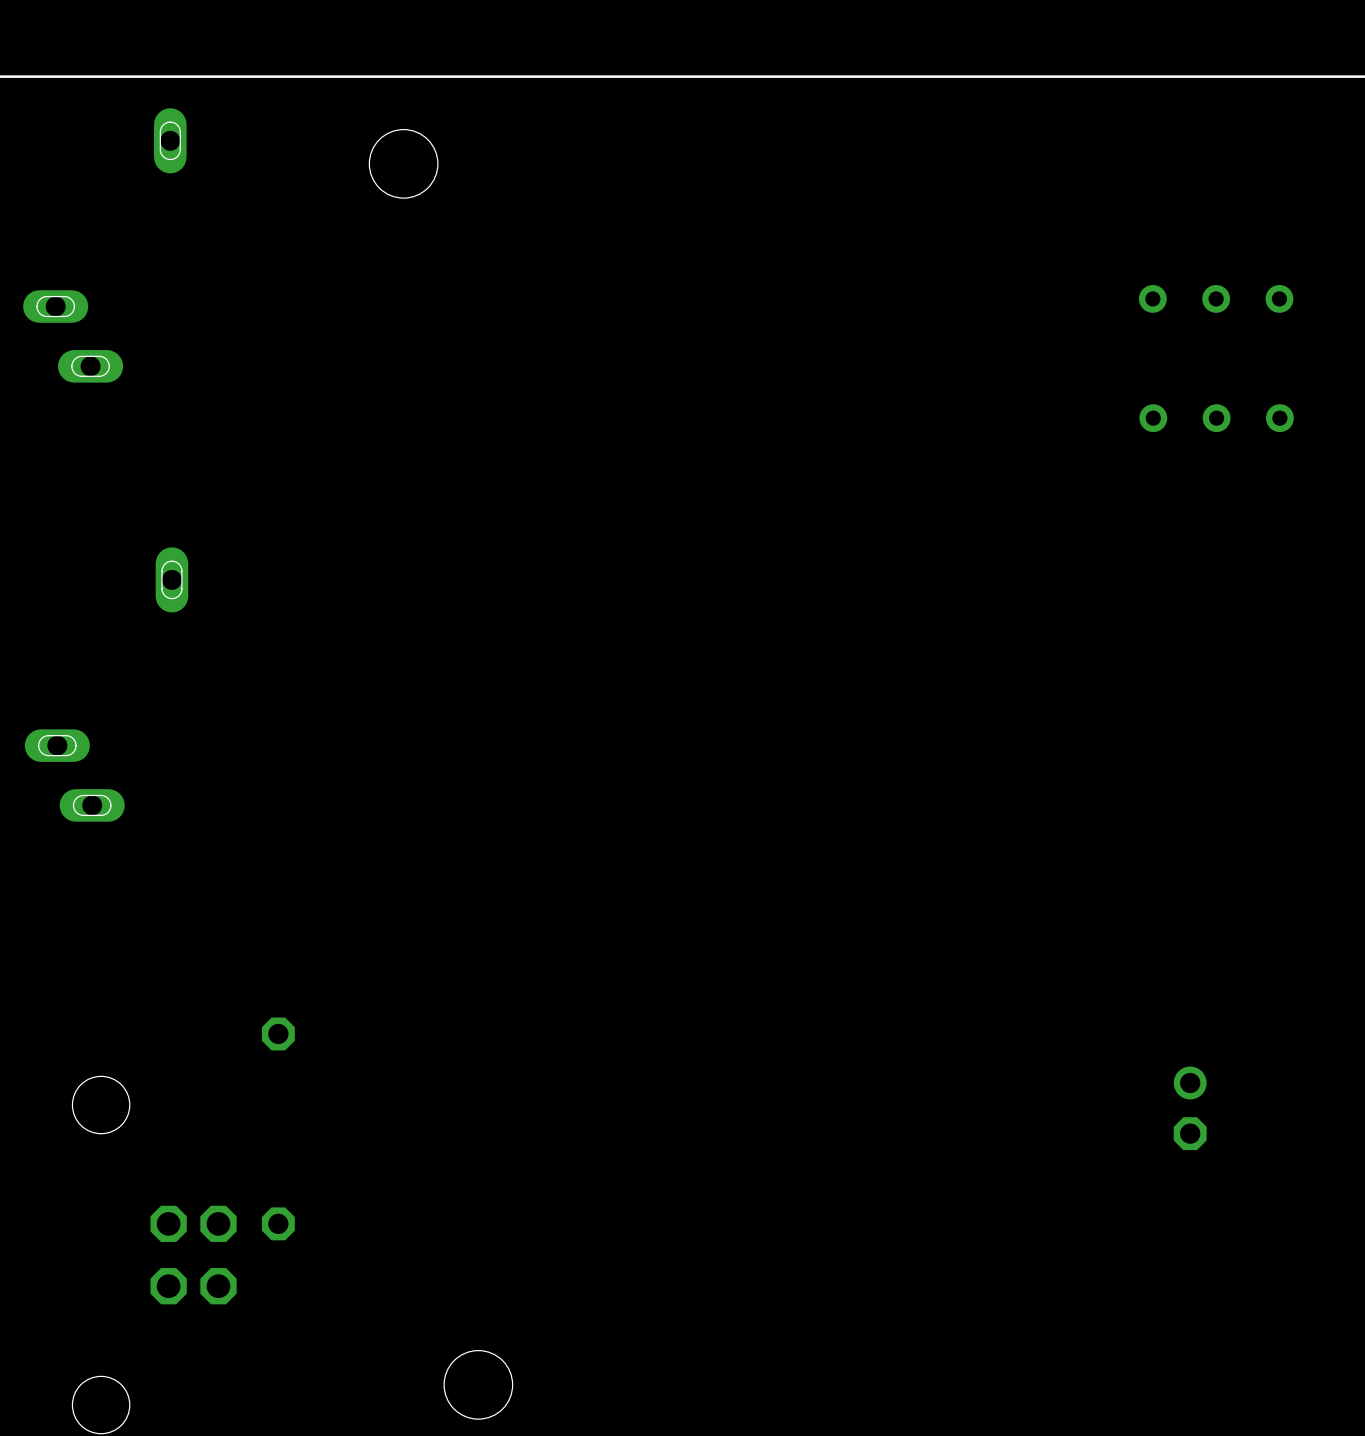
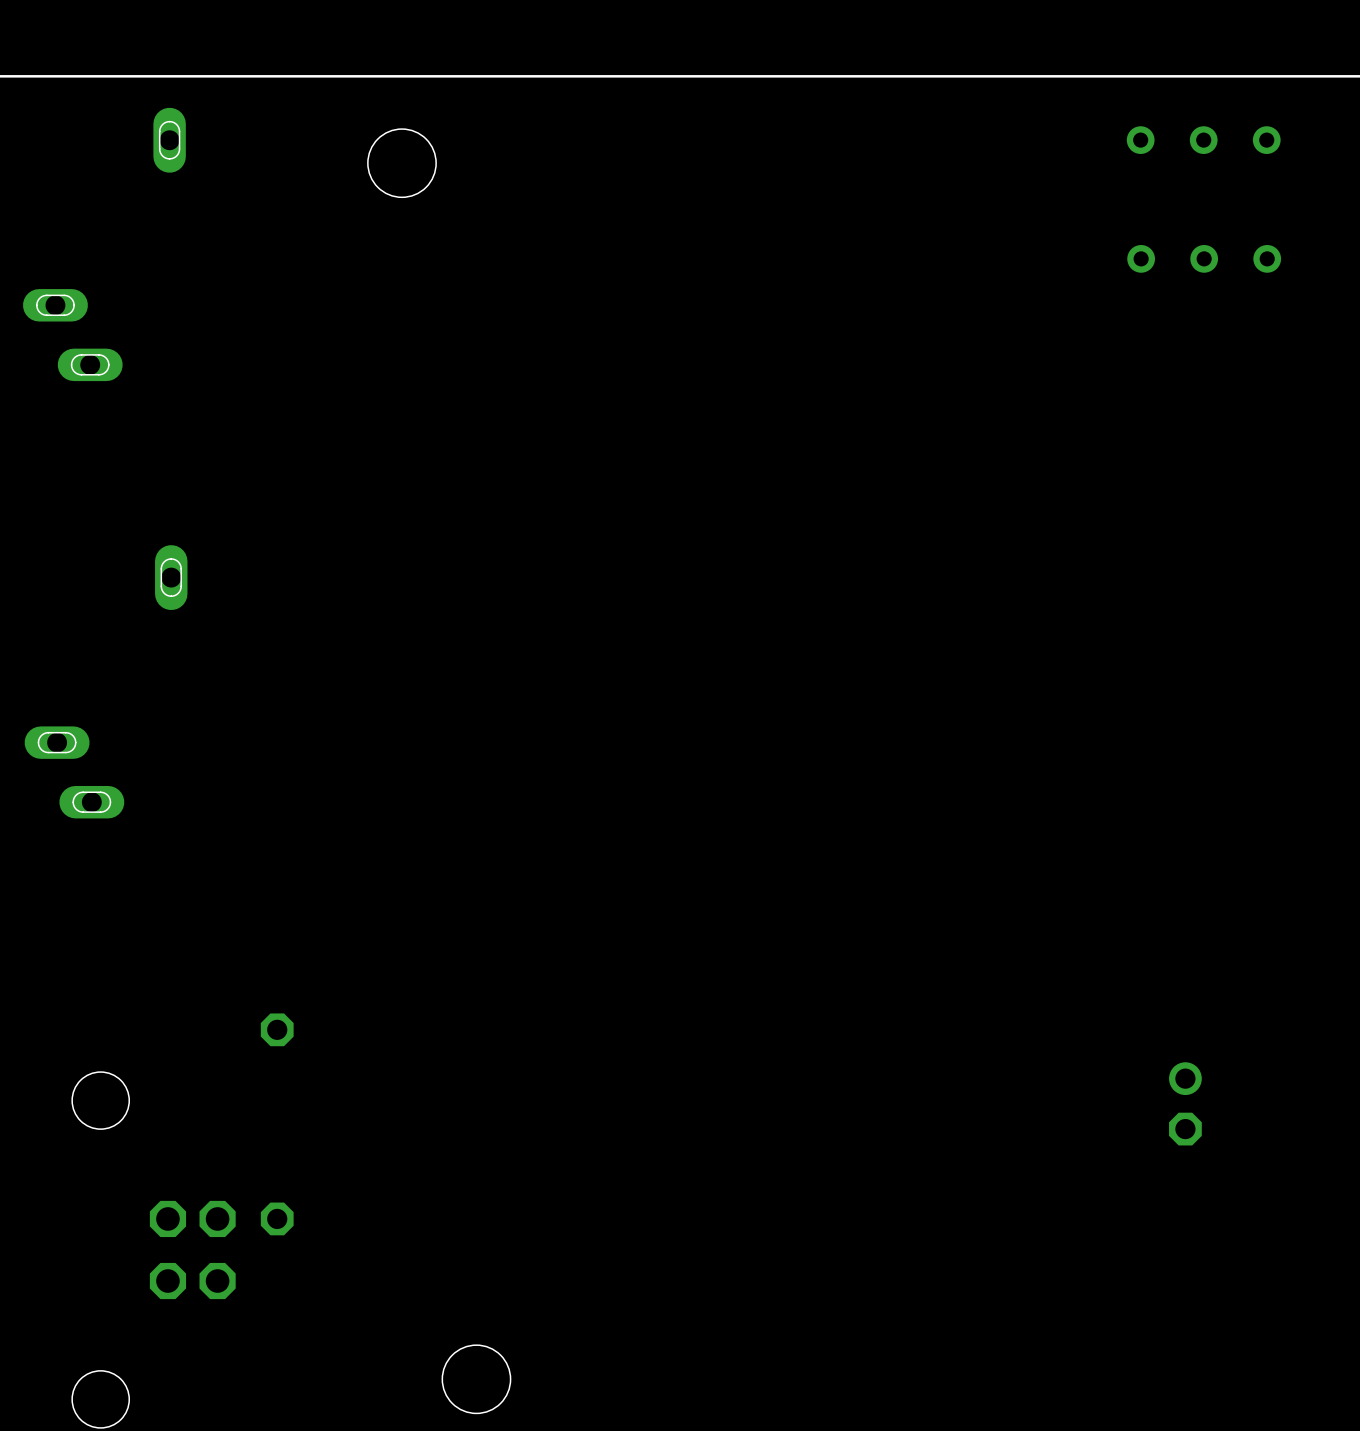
part: none -> (1203, 140)
part position: (1216, 298) -> (1204, 258)
part: (1216, 418) -> none

